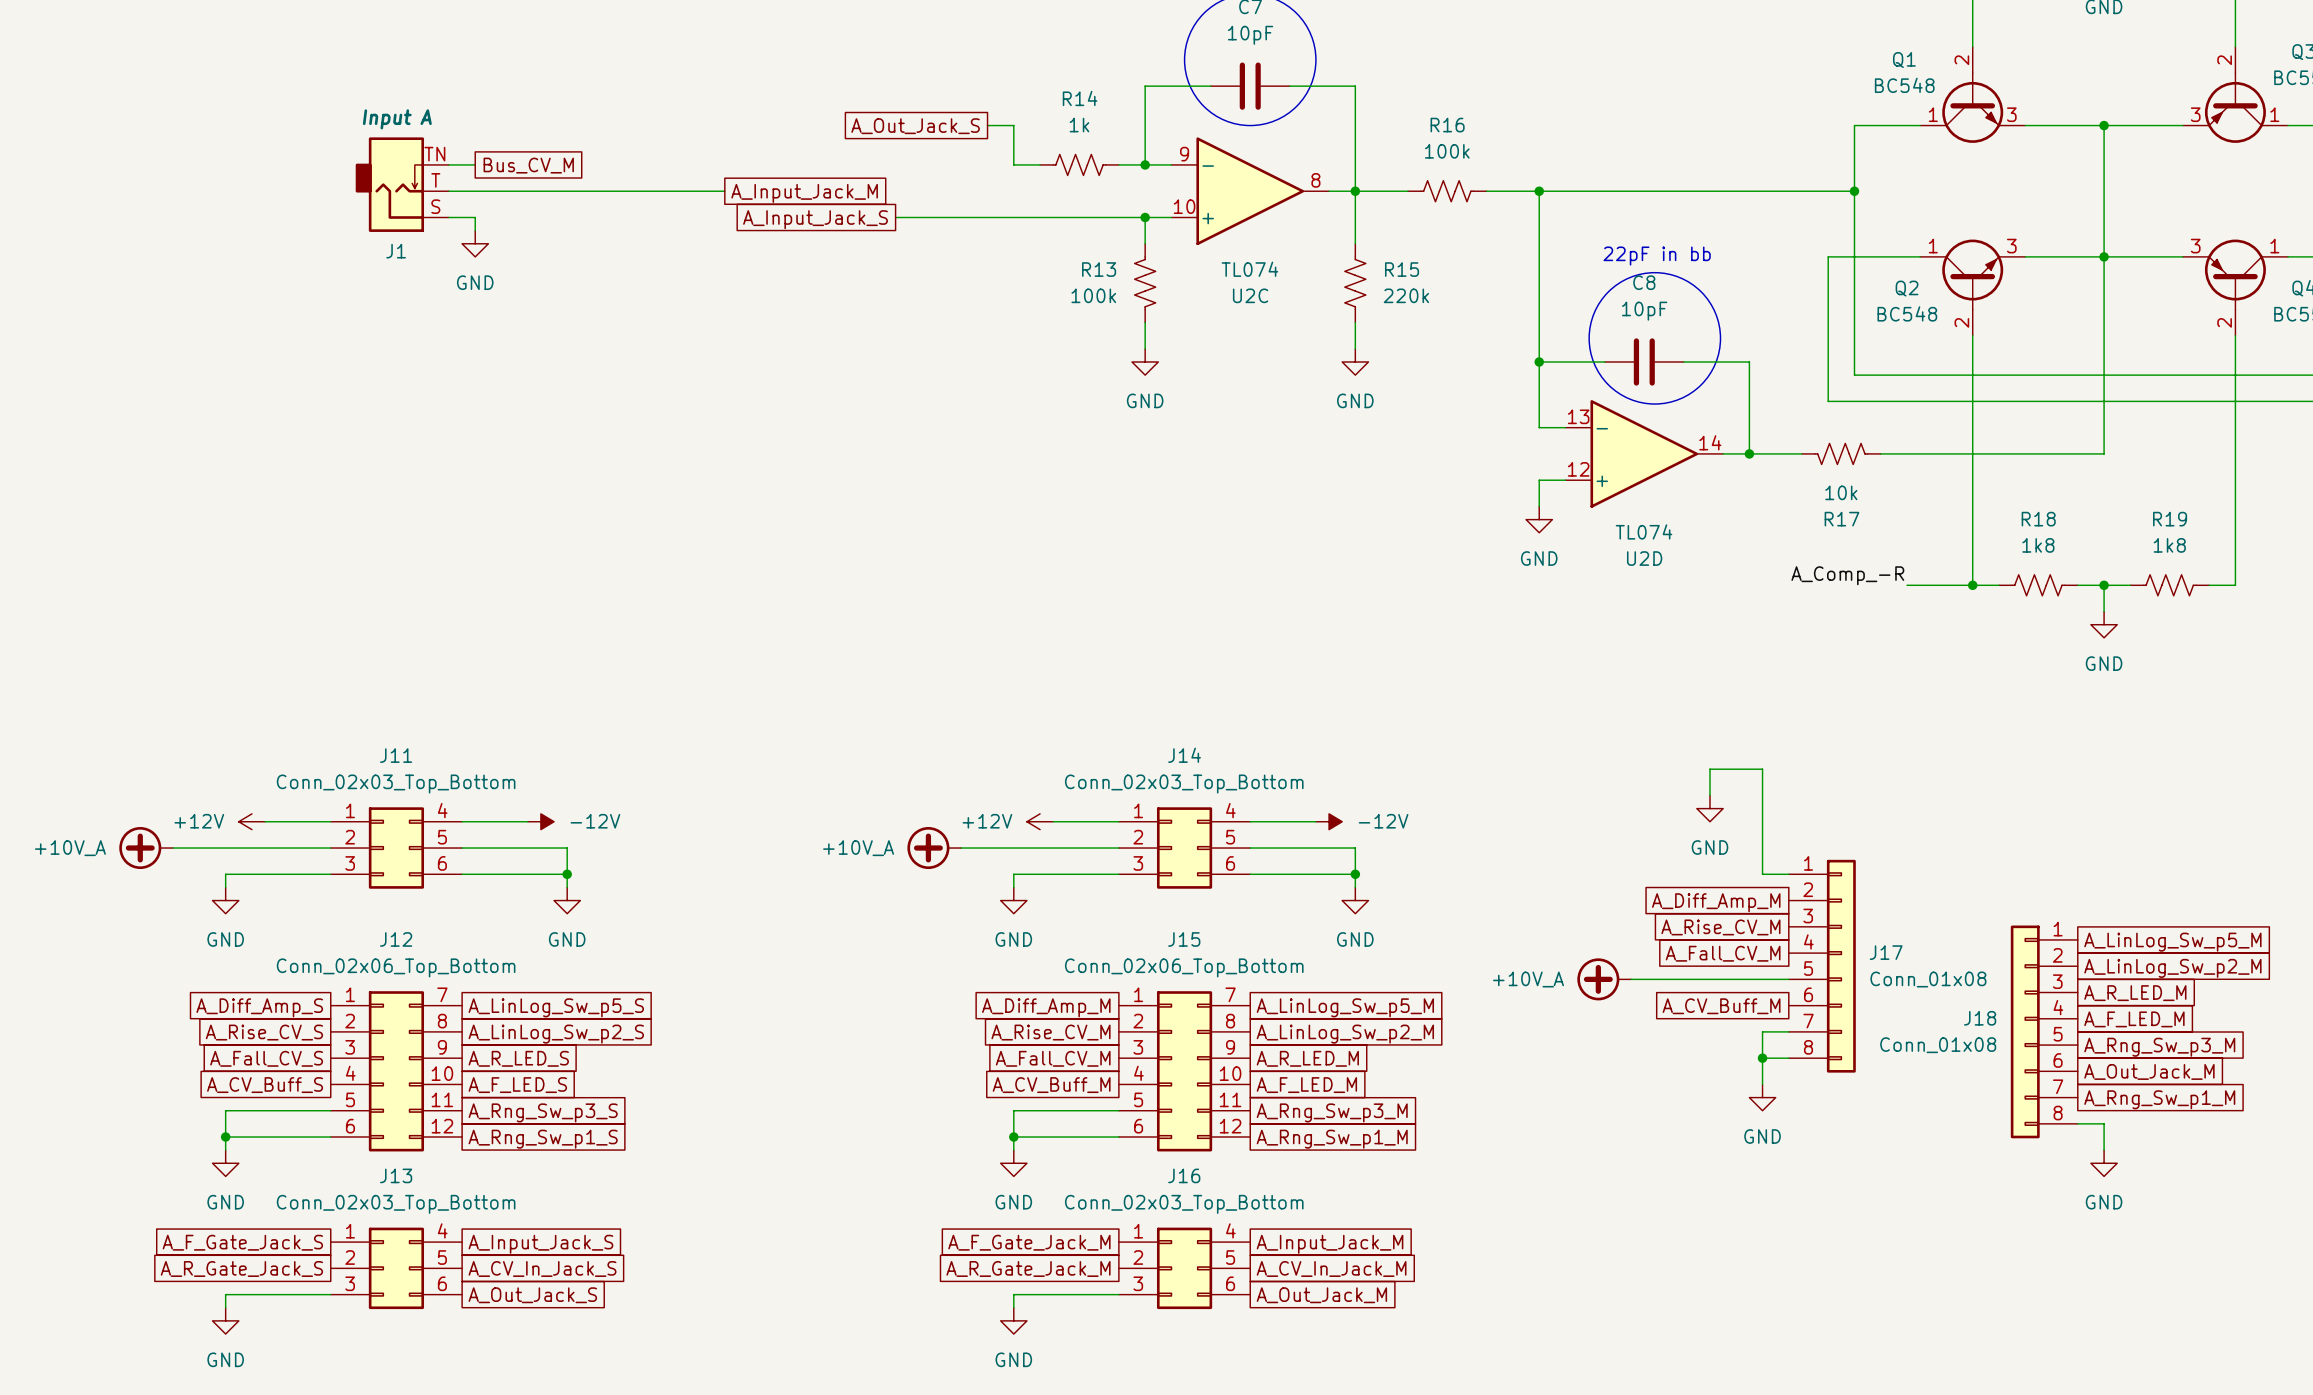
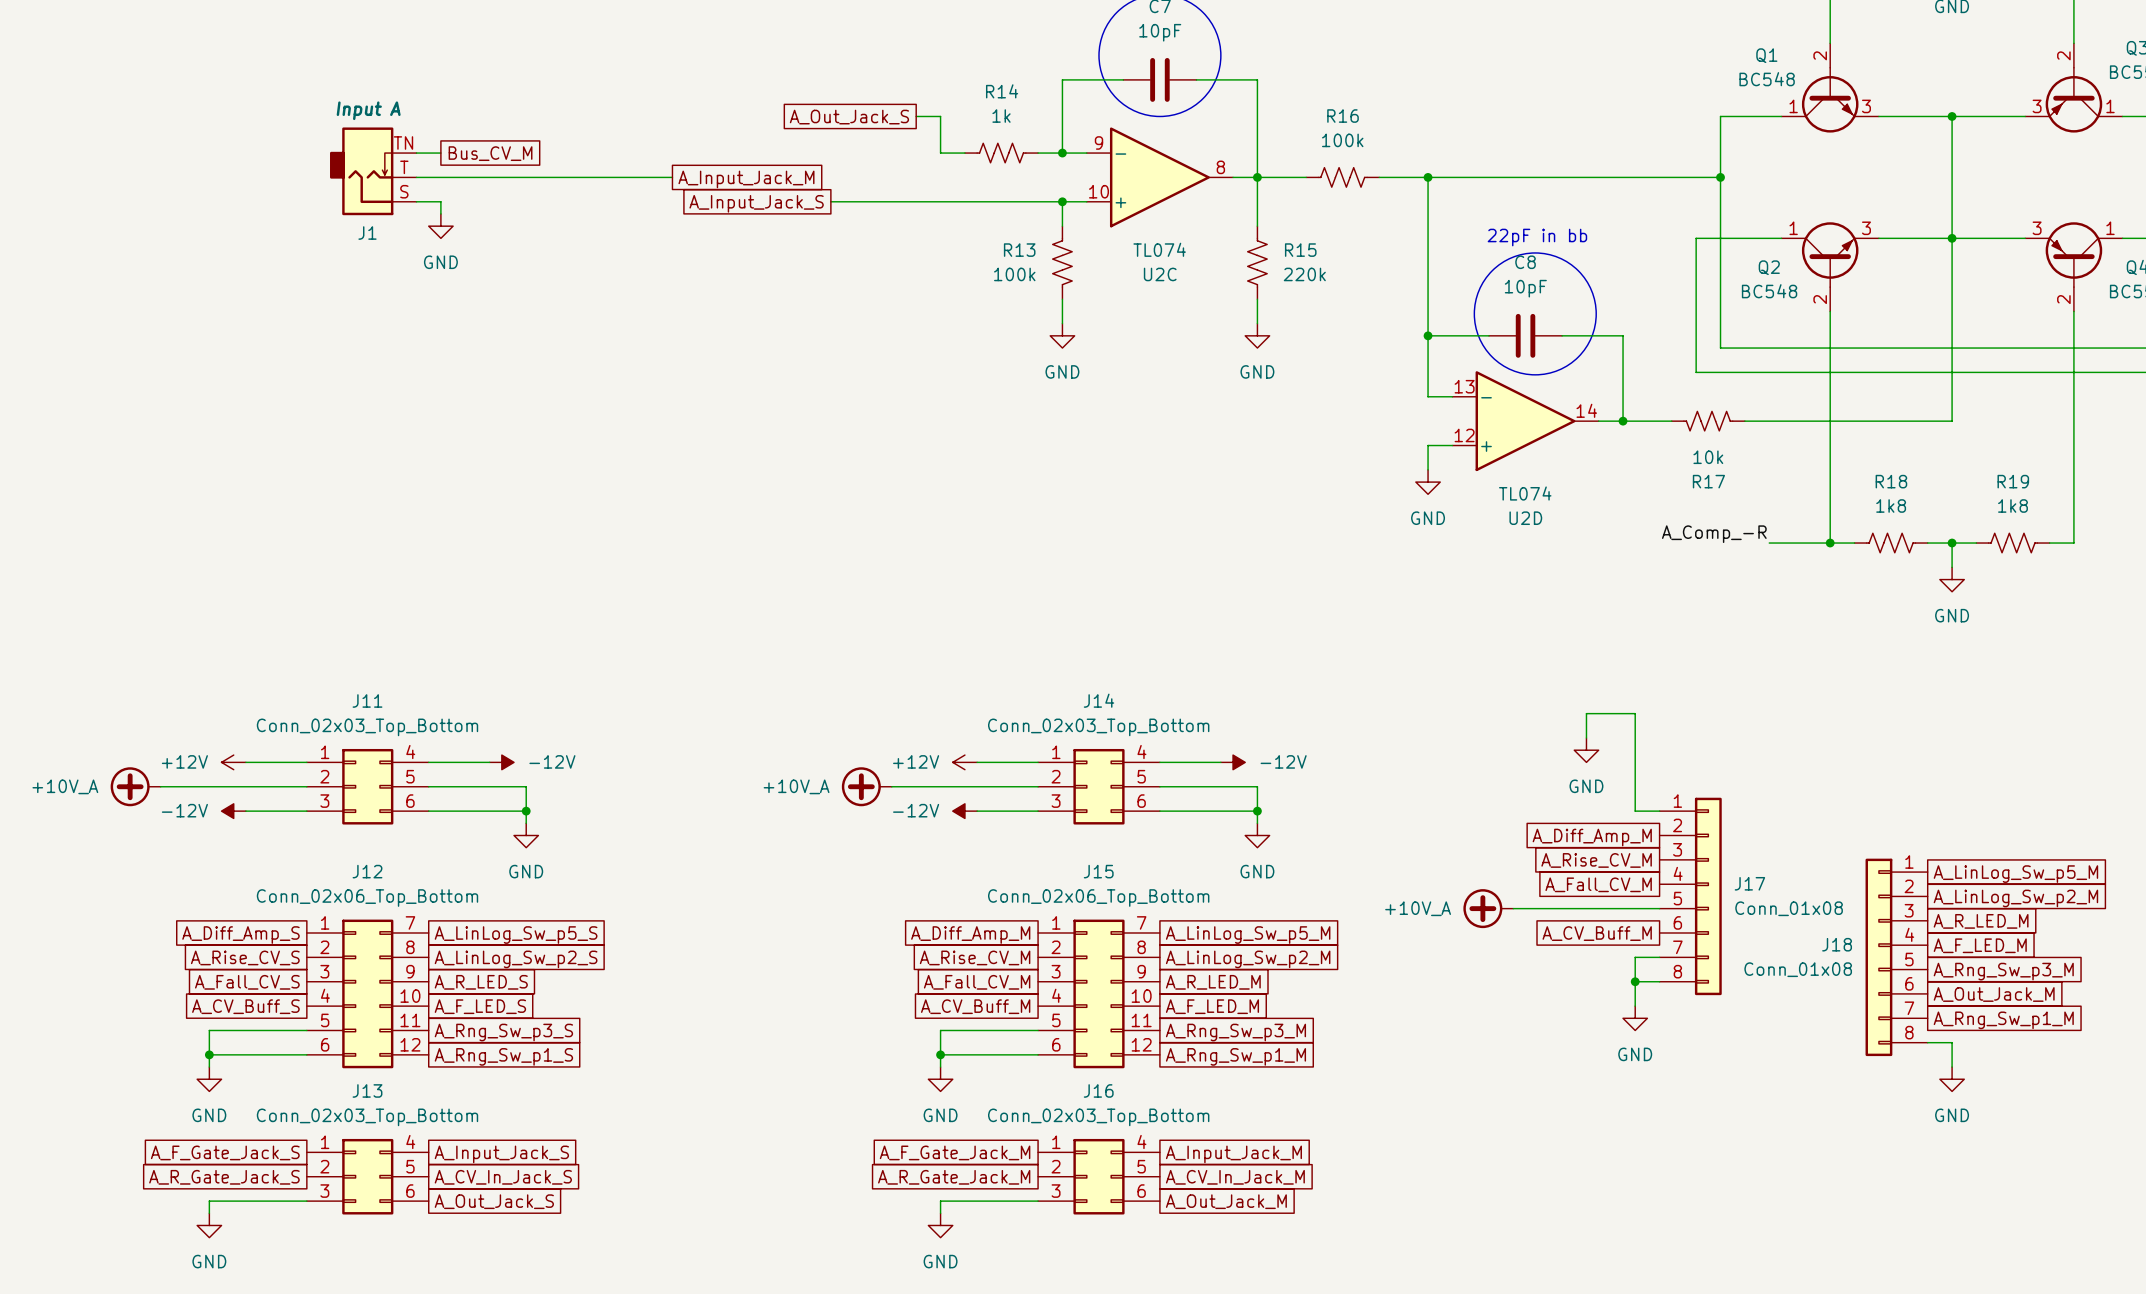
power symbol: none -> -12V (233, 811)
wire: (265, 874) (225, 874) (225, 887) -> none
power symbol: none -> -12V (964, 811)
wire: (1053, 874) (1013, 874) (1013, 887) -> none
power symbol: GND (225, 900) -> none
power symbol: GND (1013, 900) -> none

